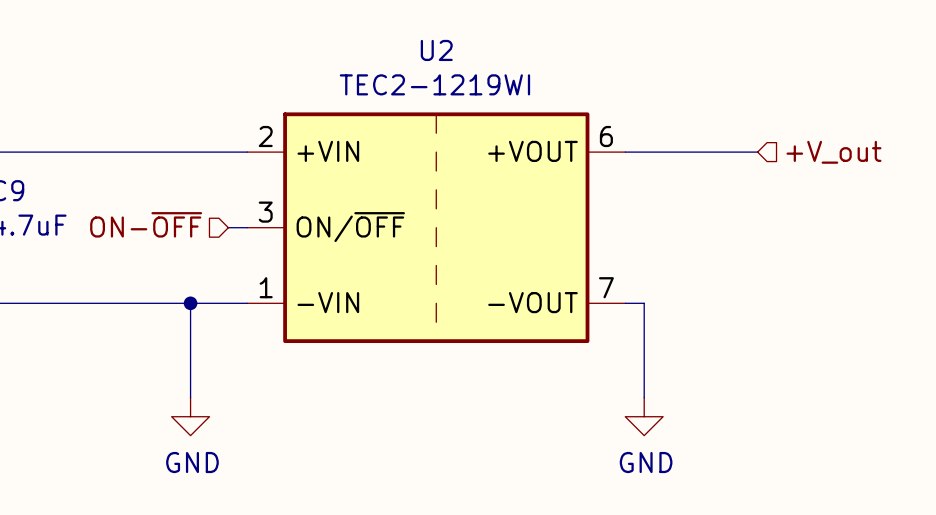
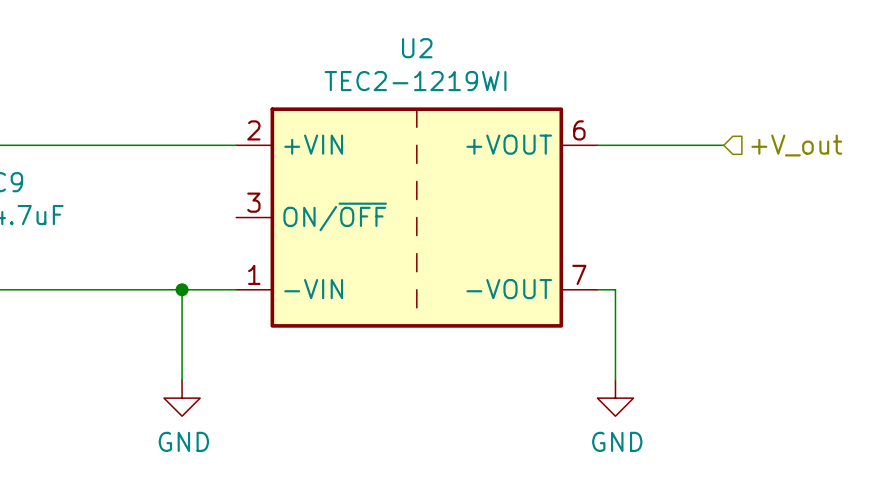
hierarchical label: ON-~{OFF} (146, 224) -> none
wire: (228, 227) (247, 227) -> none

